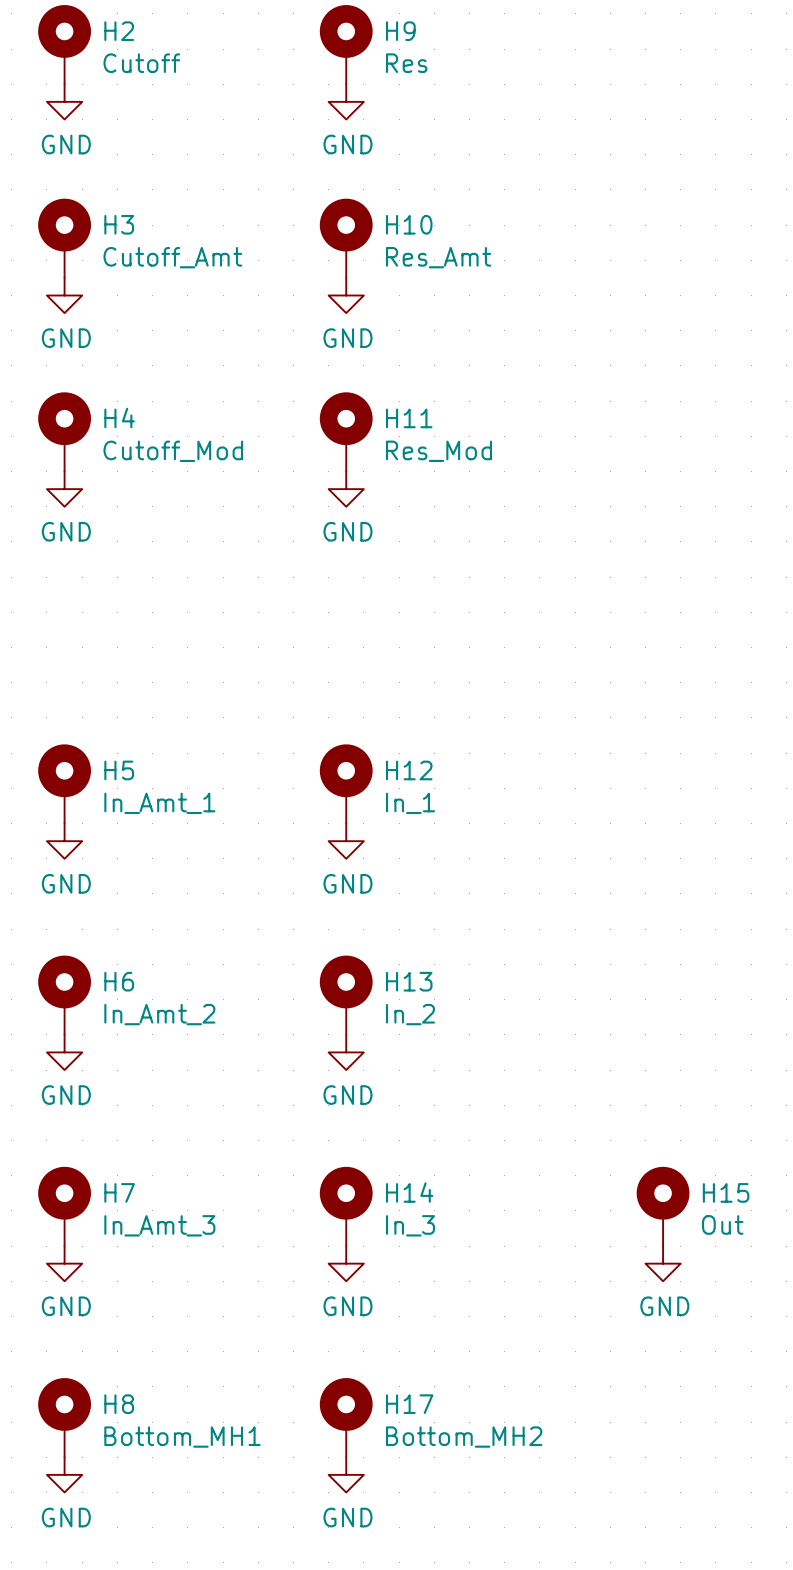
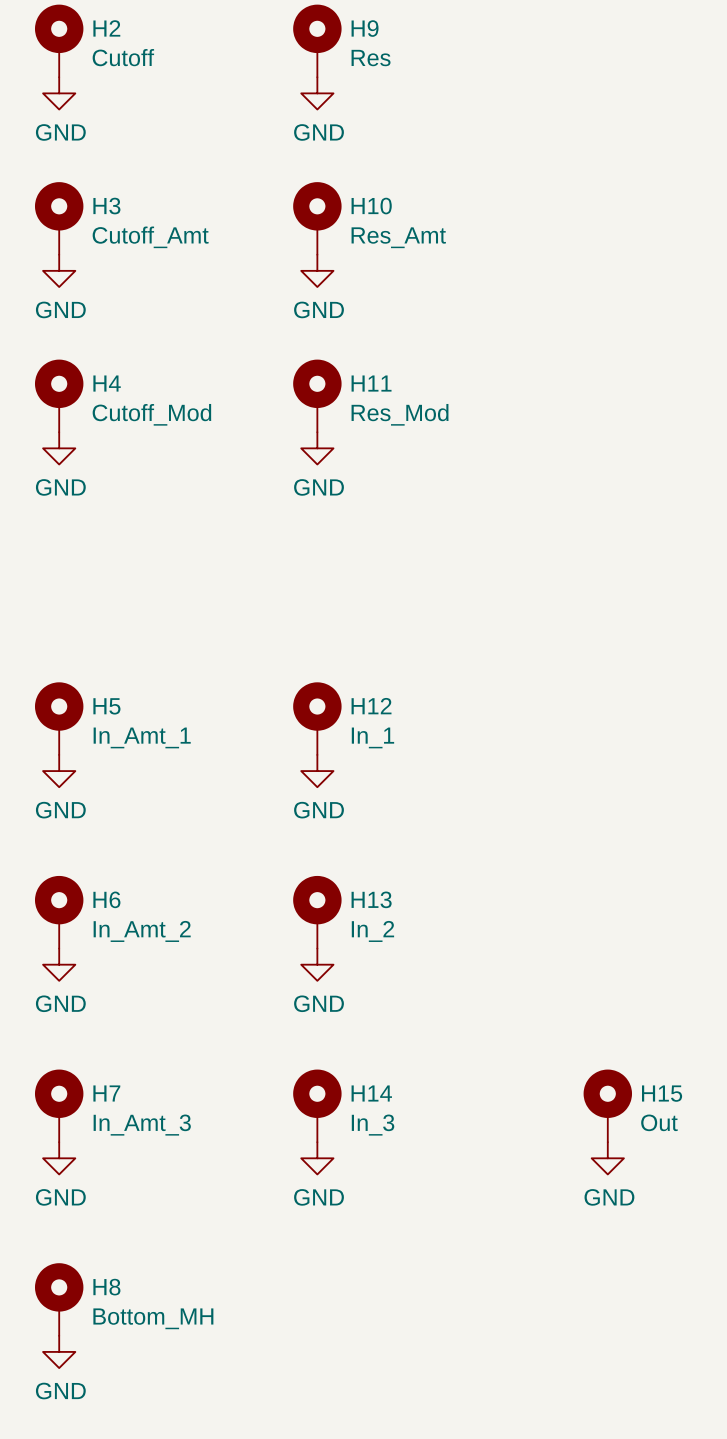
H17: Bottom_MH2 (346, 1417) -> none
H8 value: Bottom_MH1 (182, 1437) -> Bottom_MH (153, 1318)
power symbol: GND (346, 1474) -> none

